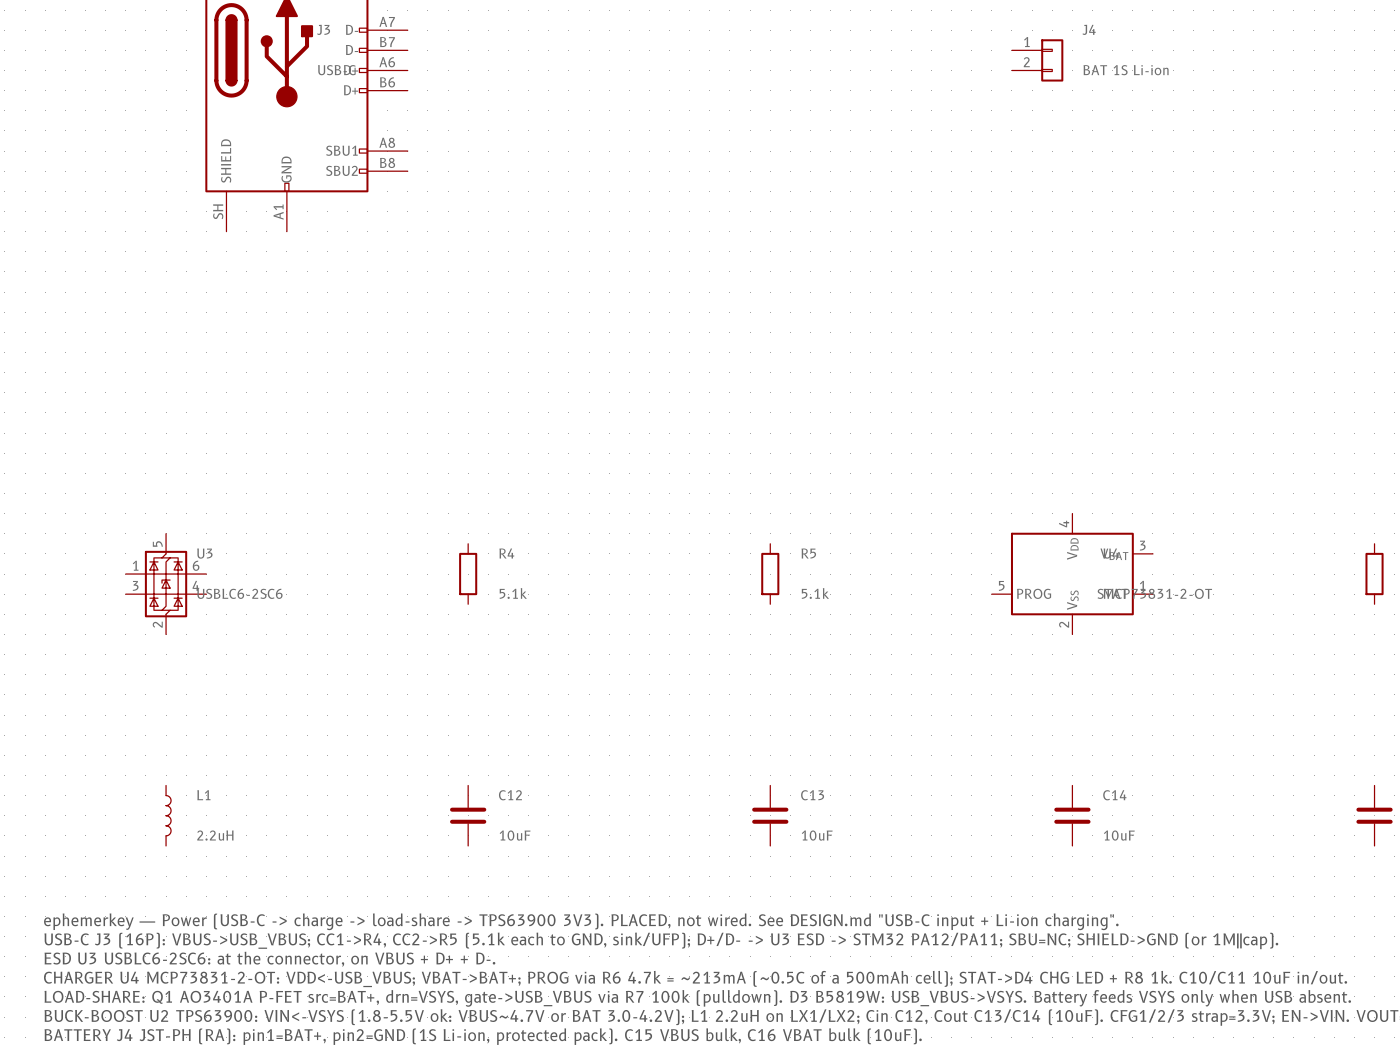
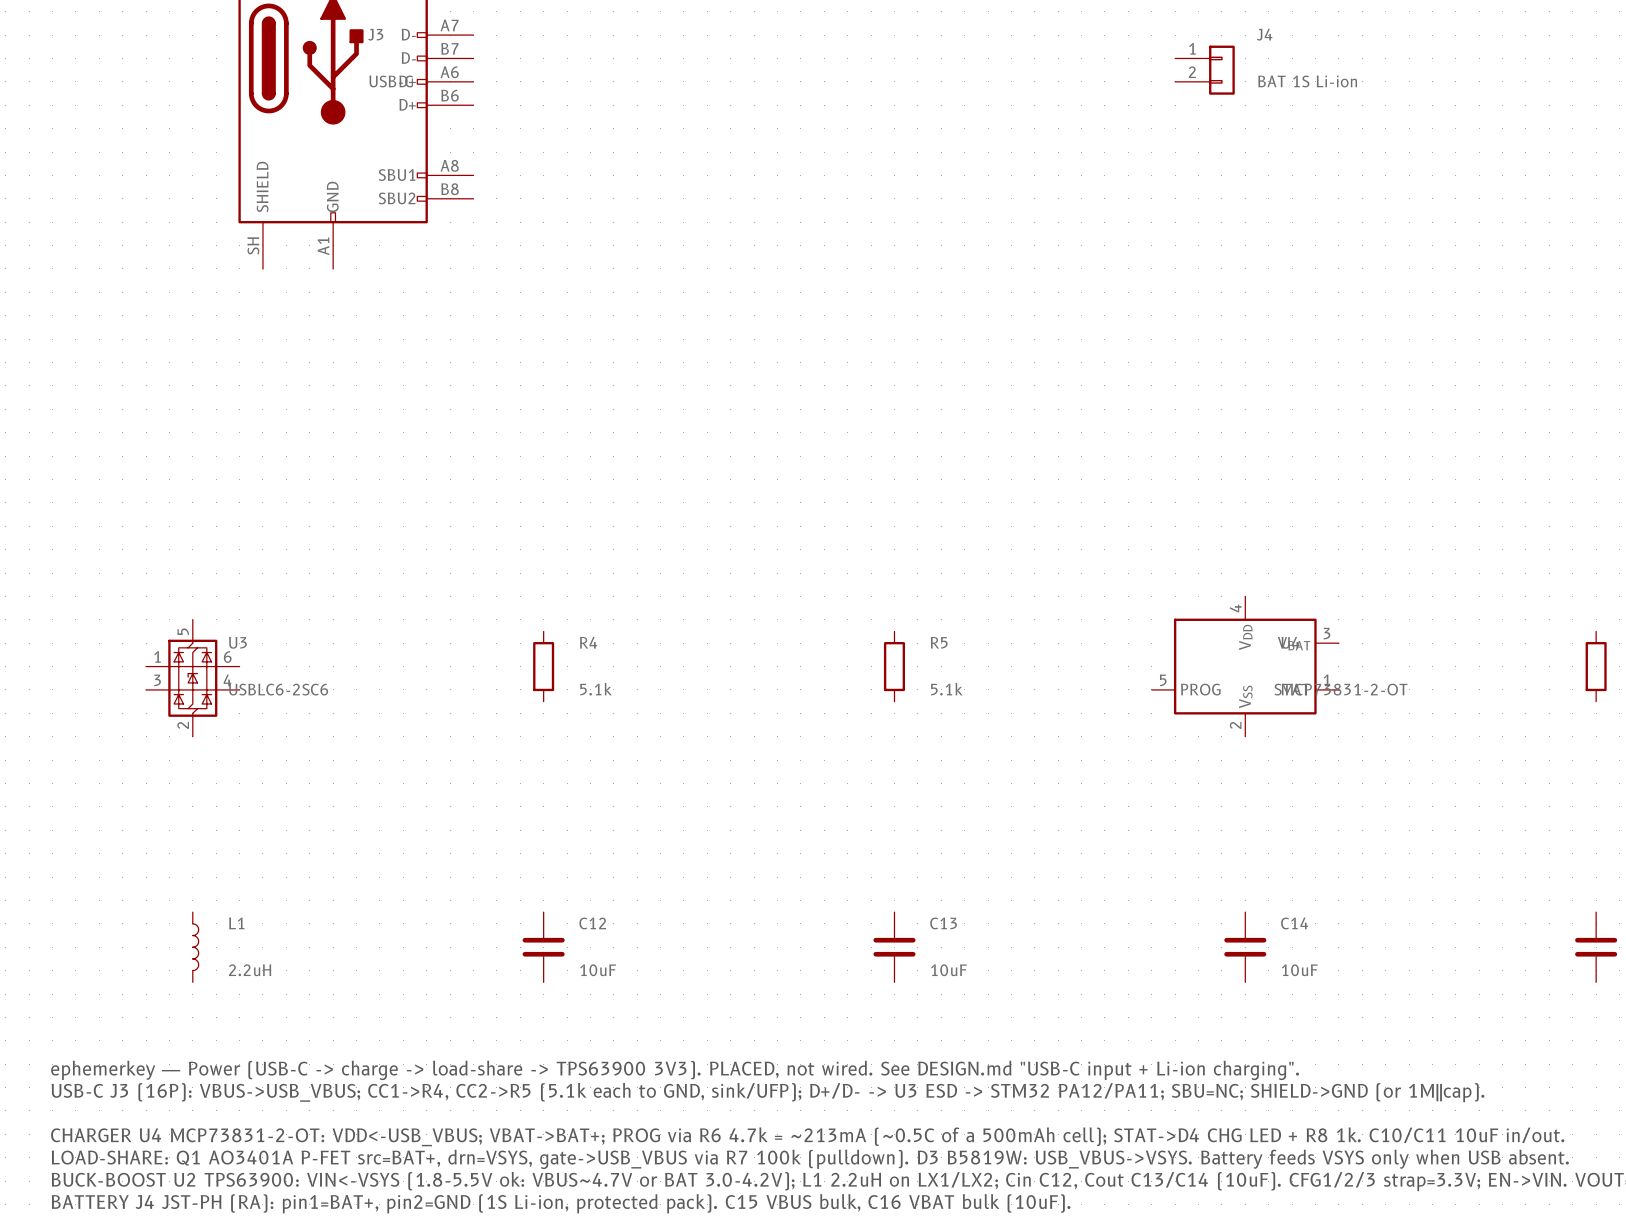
text: ESD U3 USBLC6-2SC6: at the connector, on VBUS + D+ + D-. (269, 959) -> none

